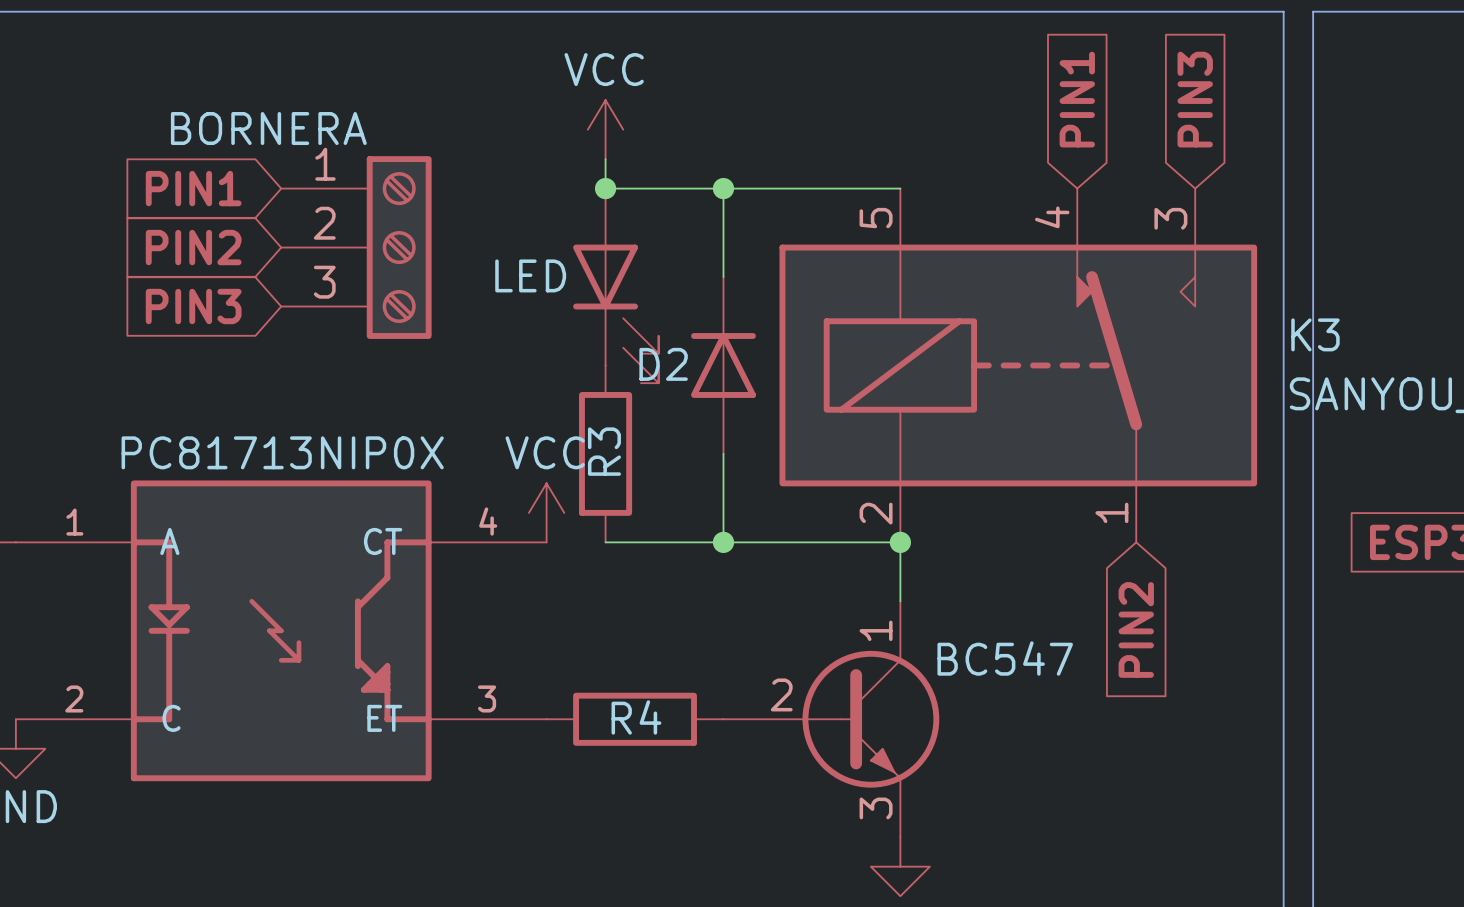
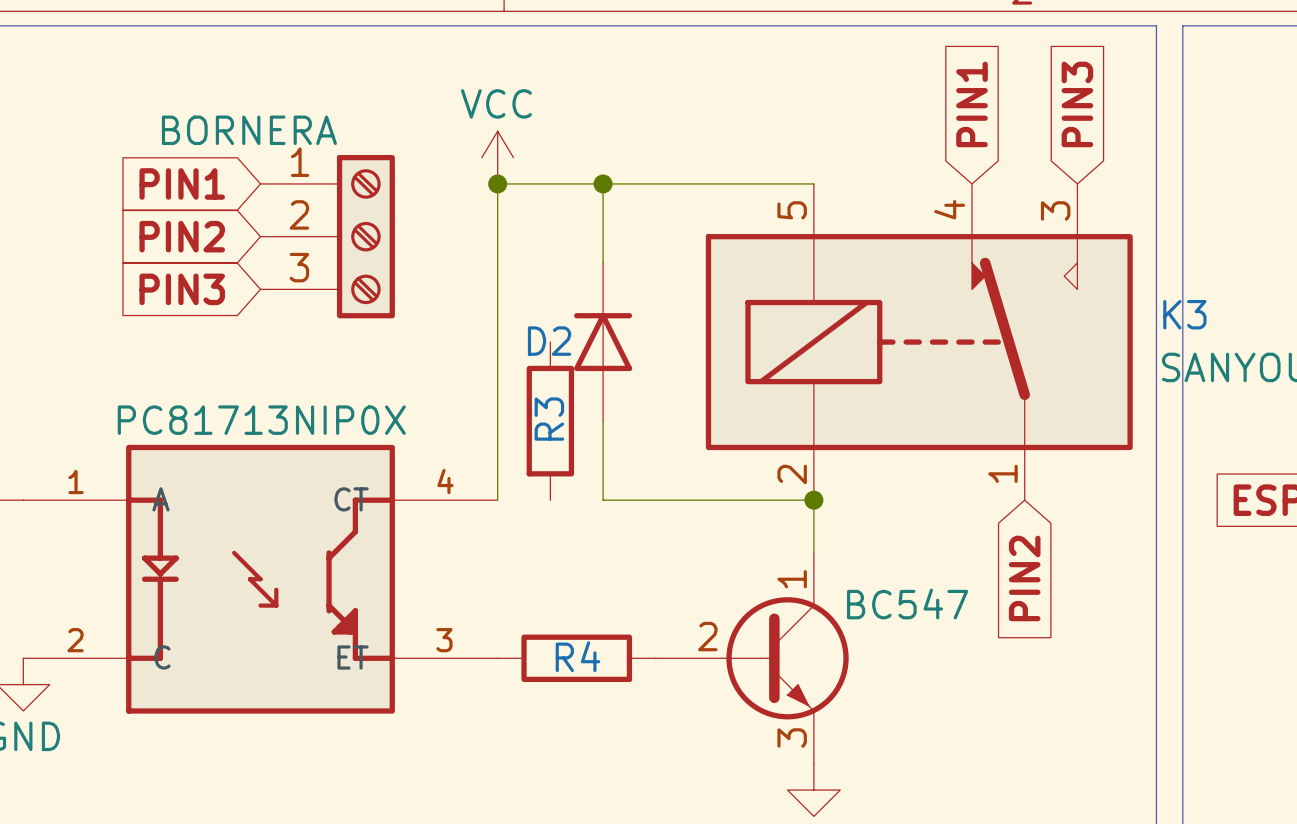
power symbol position: VCC (605, 129) -> VCC (497, 157)
wire: (605, 159) (605, 188) -> (497, 500) (497, 183) (550, 183)
junction: none -> (497, 183)
junction: (605, 188) -> none
junction: none -> (603, 183)
wire: (723, 188) (723, 277) -> (603, 183) (603, 263)
junction: (723, 188) -> none
part: LED (615, 285) -> none
D2 position: (723, 365) -> (603, 342)
wire: (723, 453) (723, 542) -> none
power symbol: VCC (546, 512) -> none
wire: (605, 542) (664, 542) -> (603, 421) (603, 500)
junction: (723, 542) -> none

